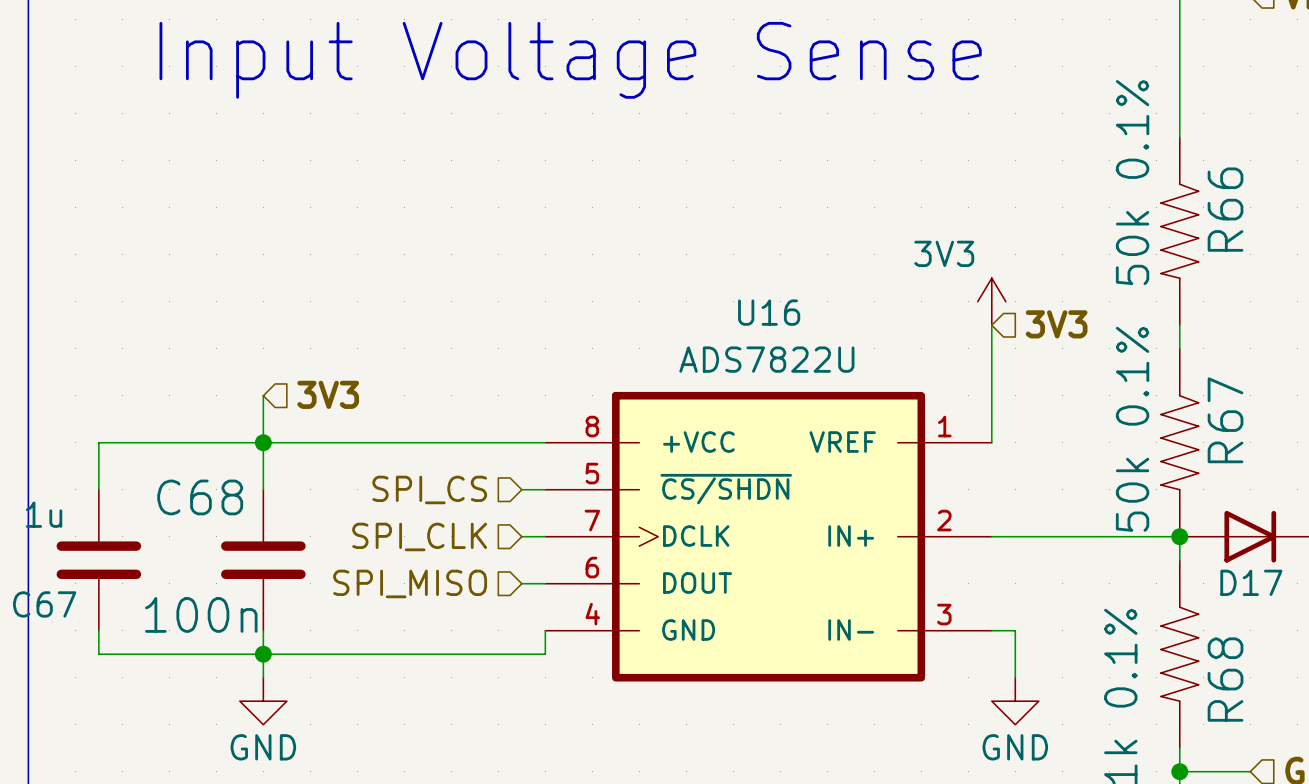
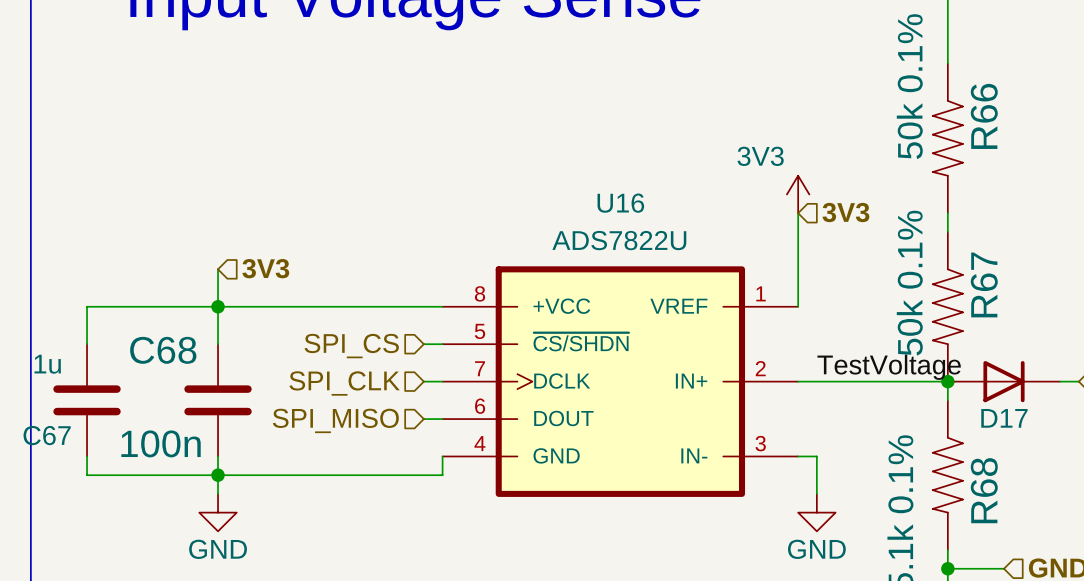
label: none -> TestVoltage (889, 367)

